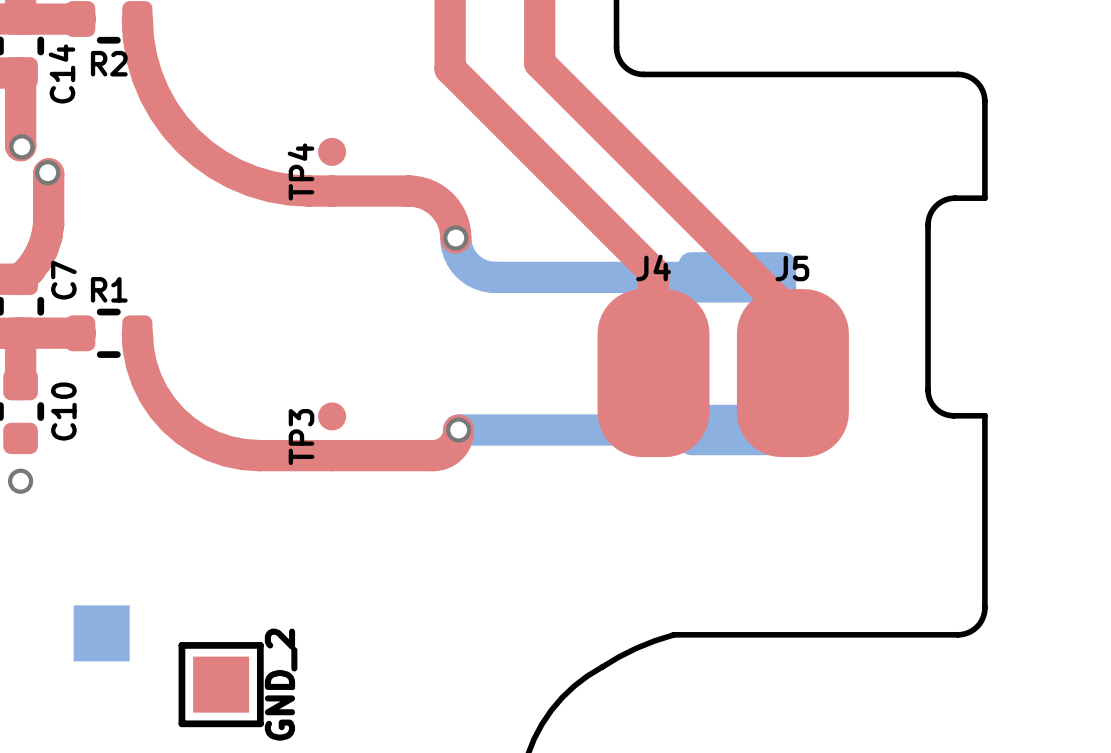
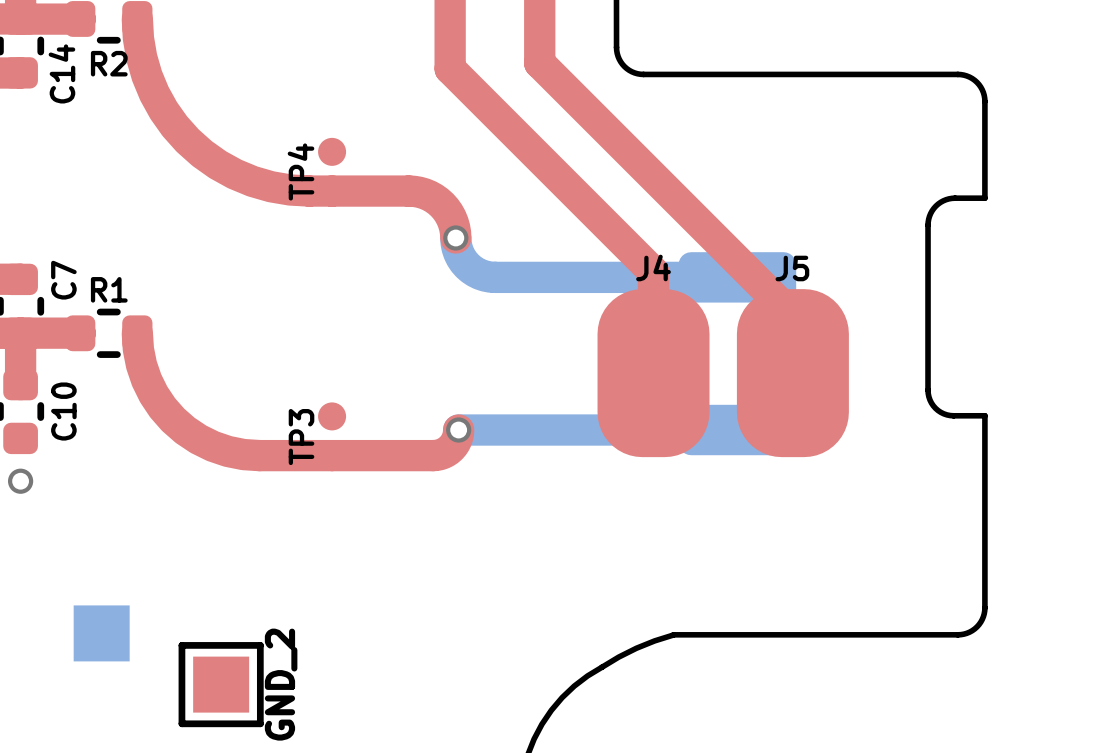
top track: (20, 72) (20, 145) -> none
via: (21, 146) -> none
via: (47, 172) -> none
top track: (48, 174) (48, 224) (46, 236) (37, 259) (20, 279) -> none

